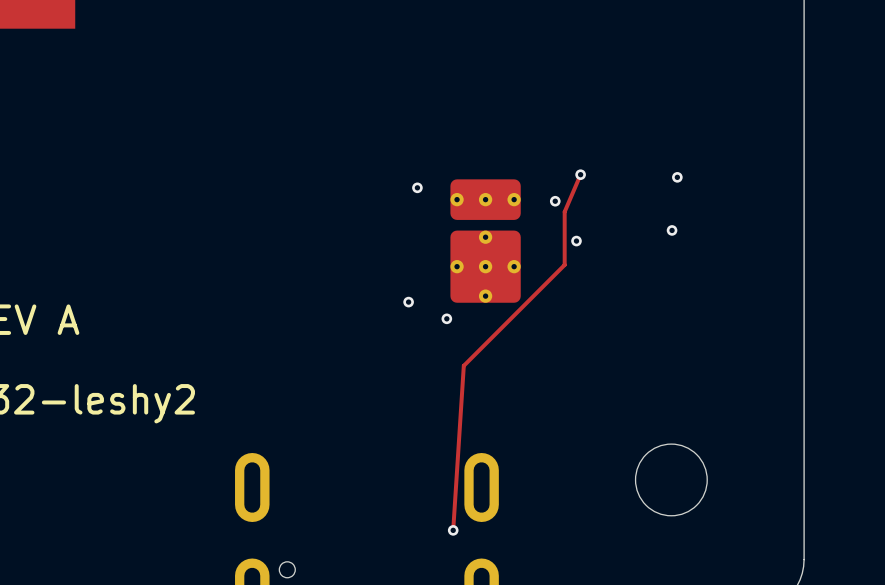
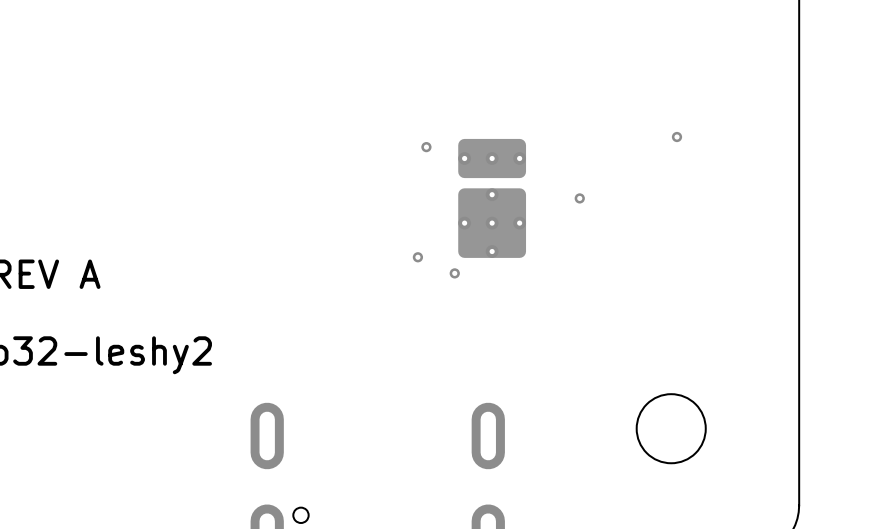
track: (580, 174) (564, 211) (564, 264) (463, 365) (453, 530) -> none
via: (580, 174) -> none
via: (555, 201) -> none
via: (672, 230) -> none
via: (453, 530) -> none

